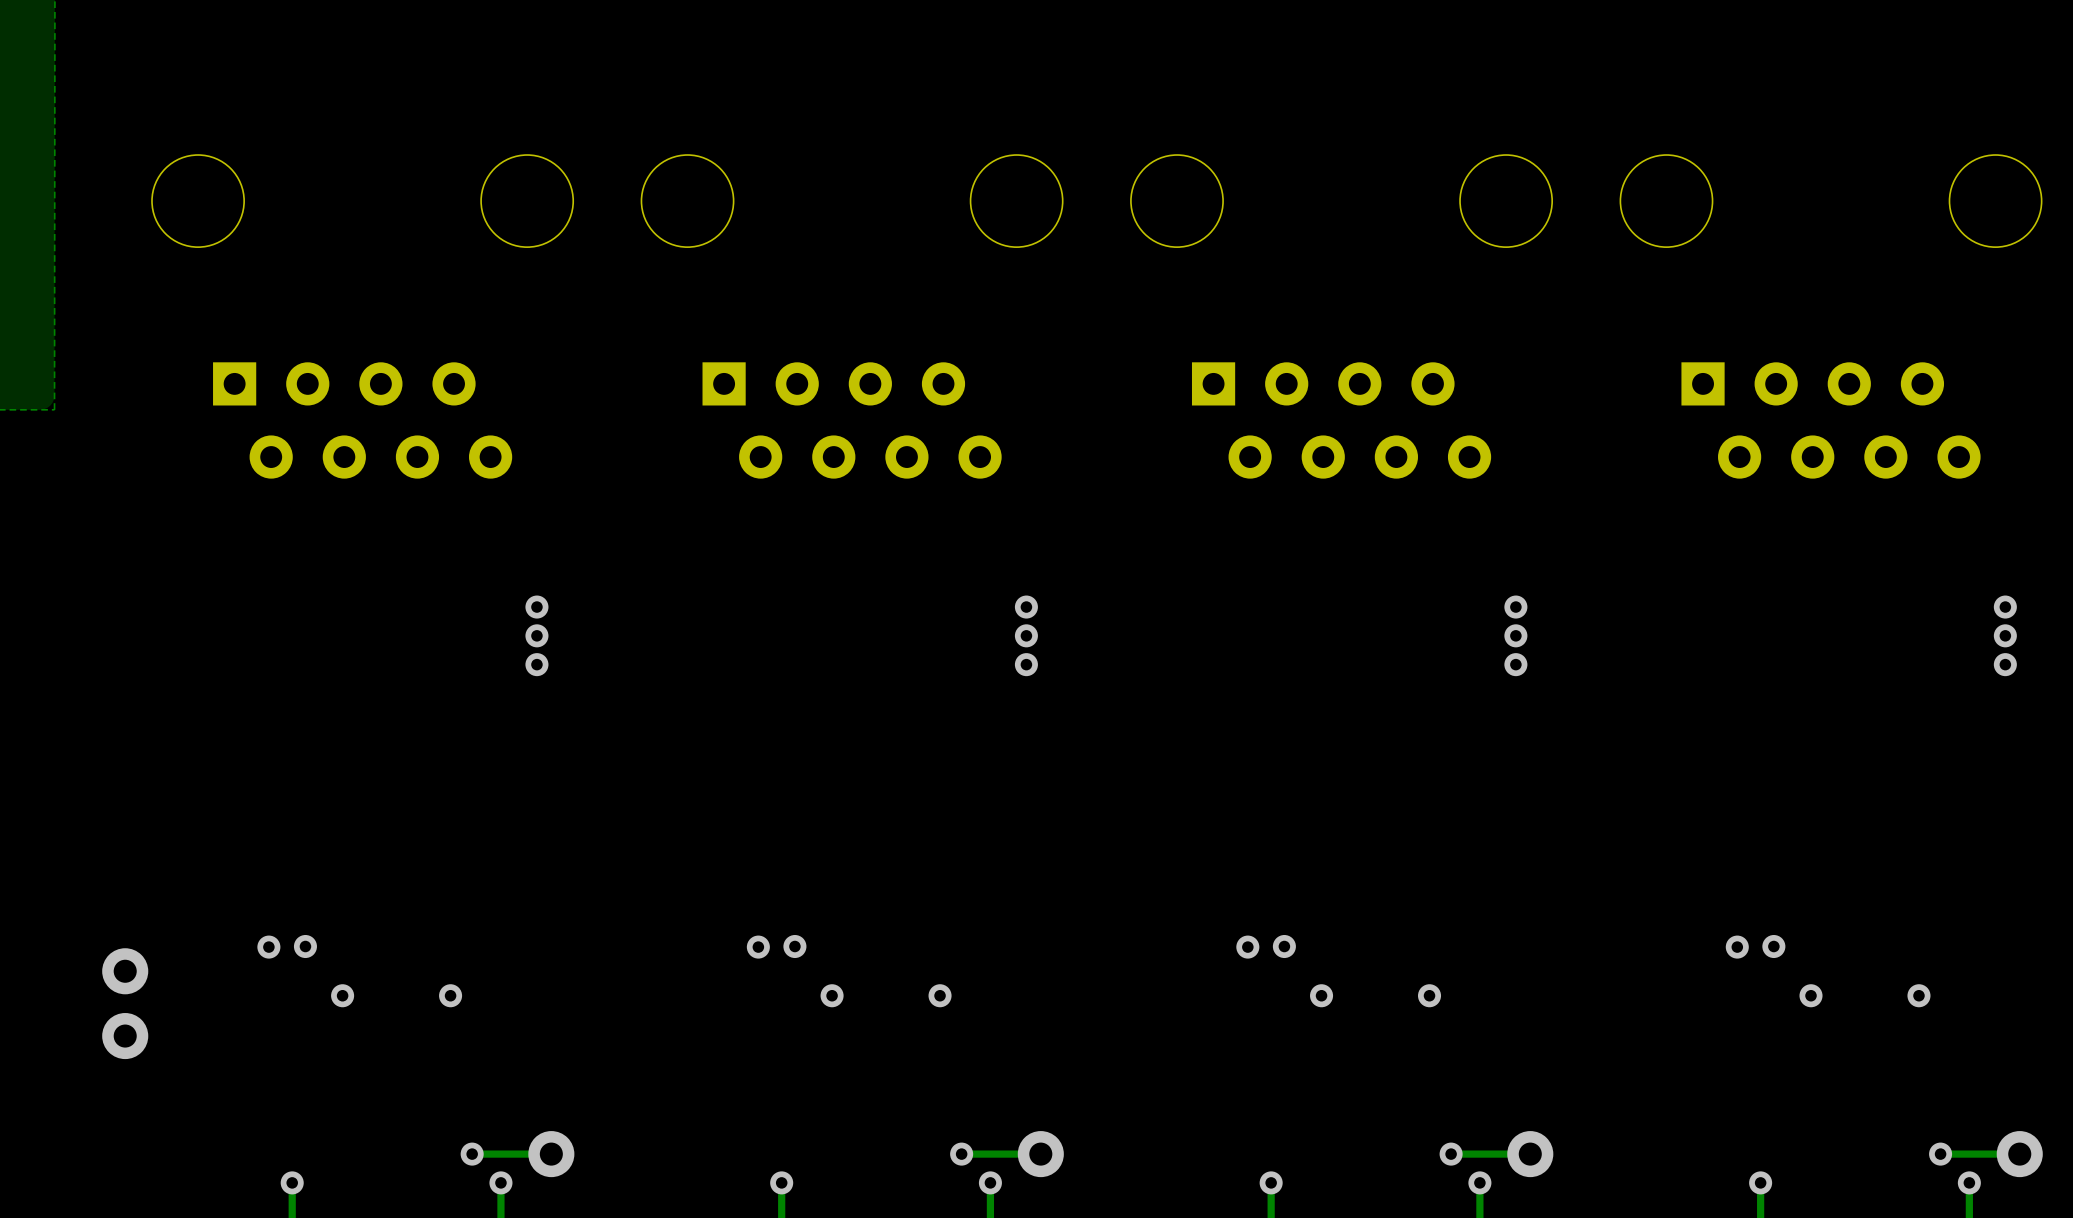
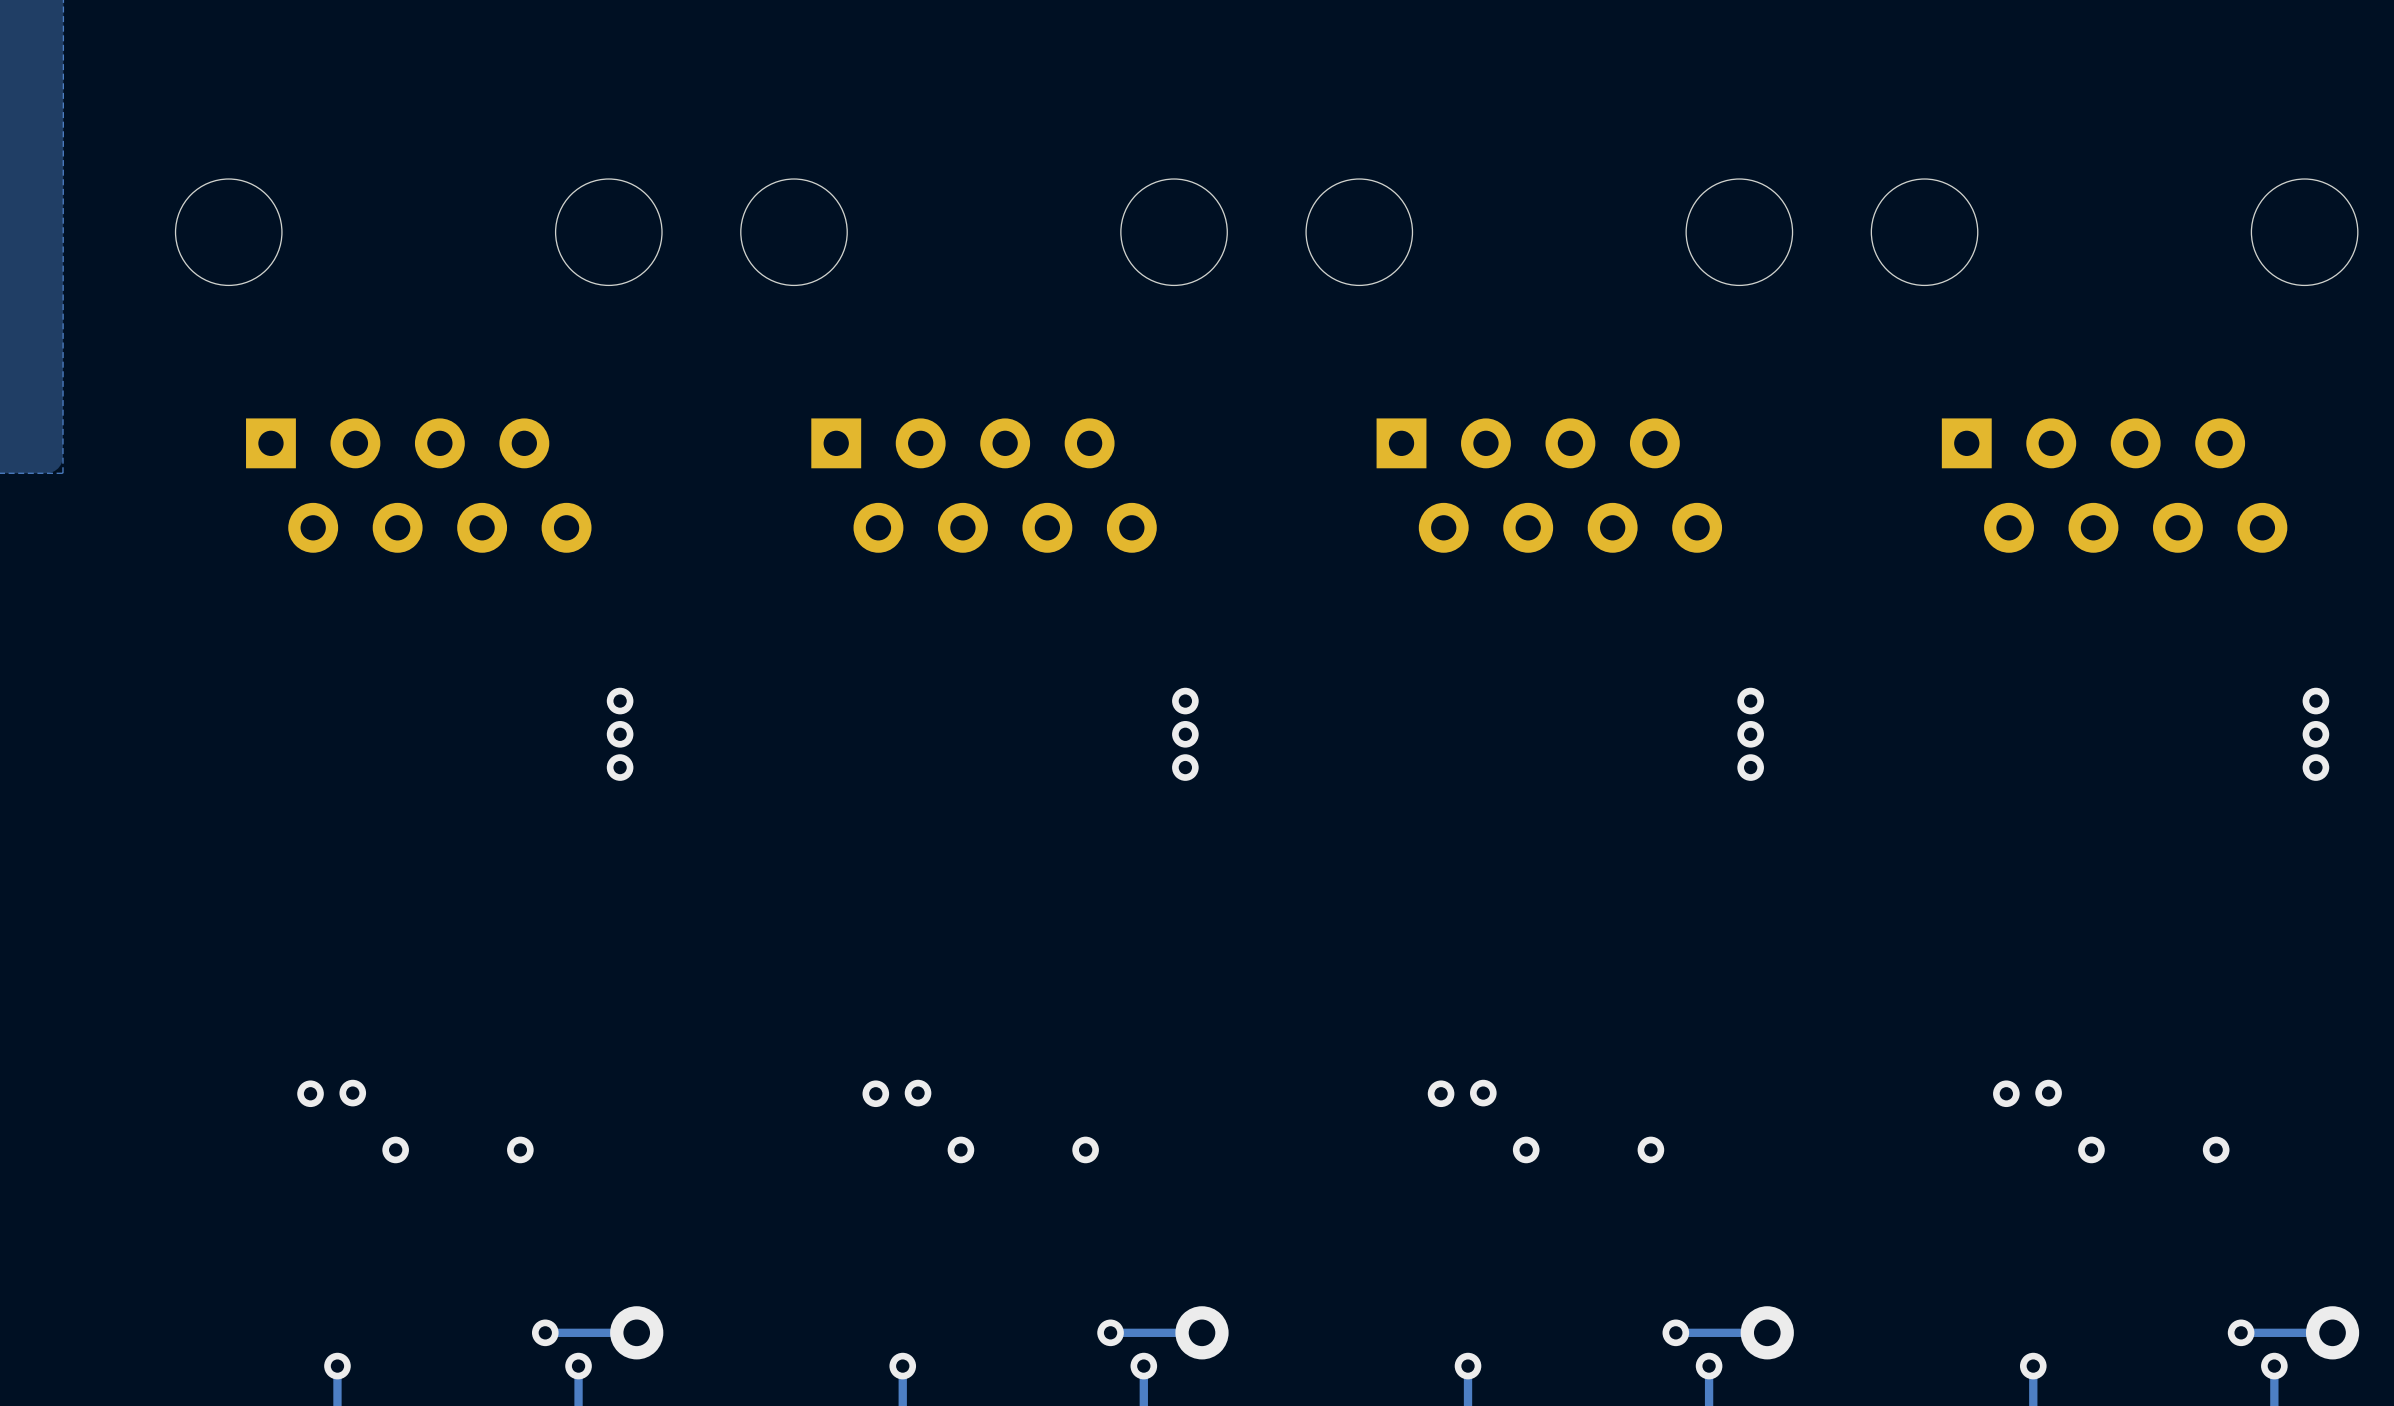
via: (125, 971) -> none
via: (125, 1036) -> none

